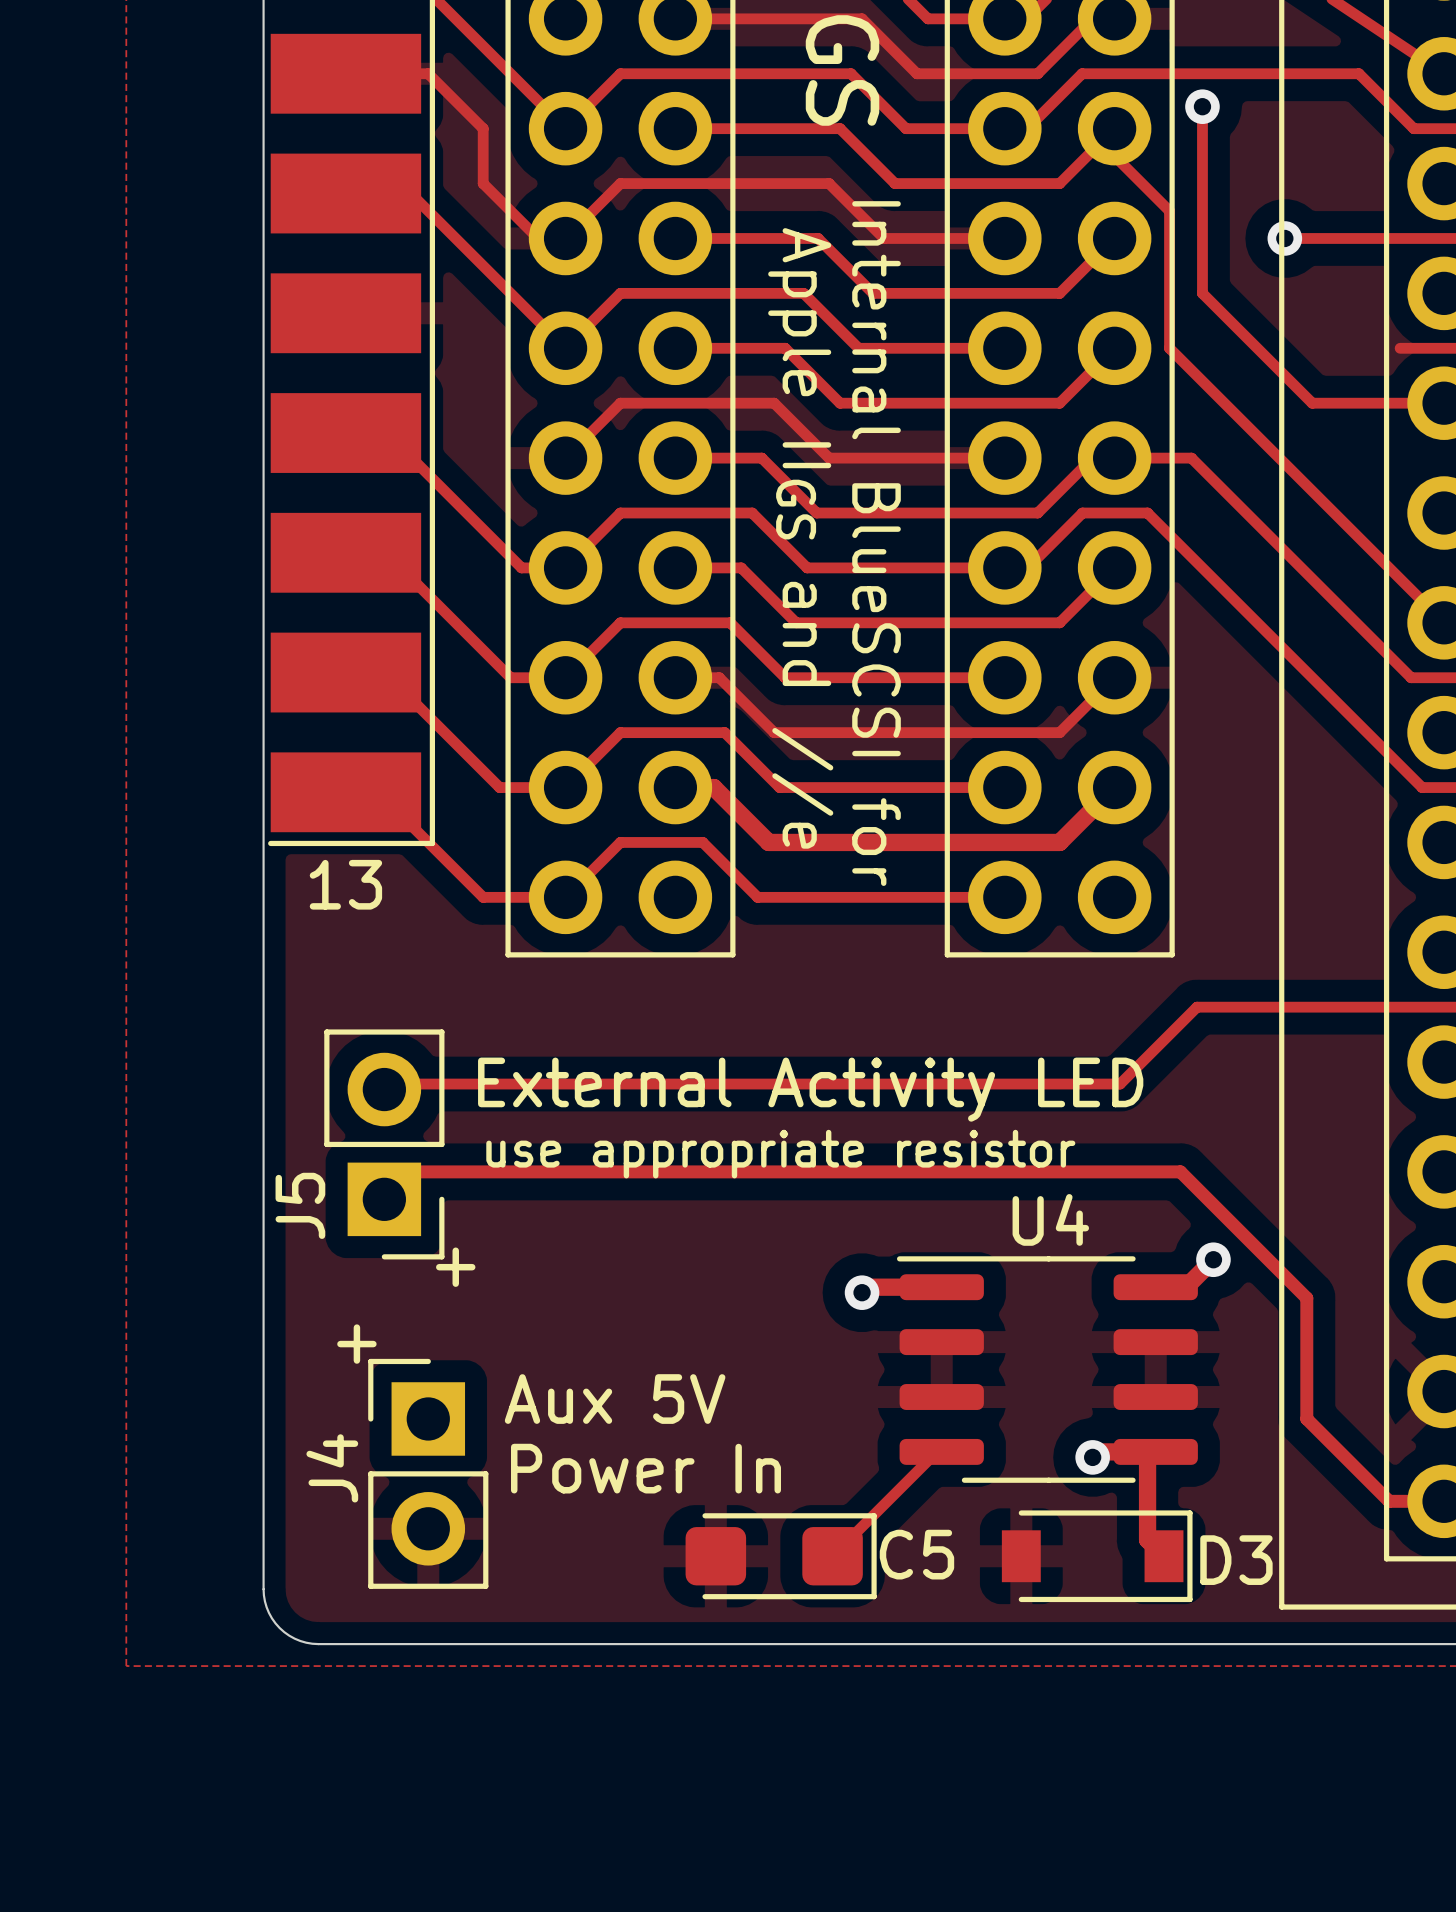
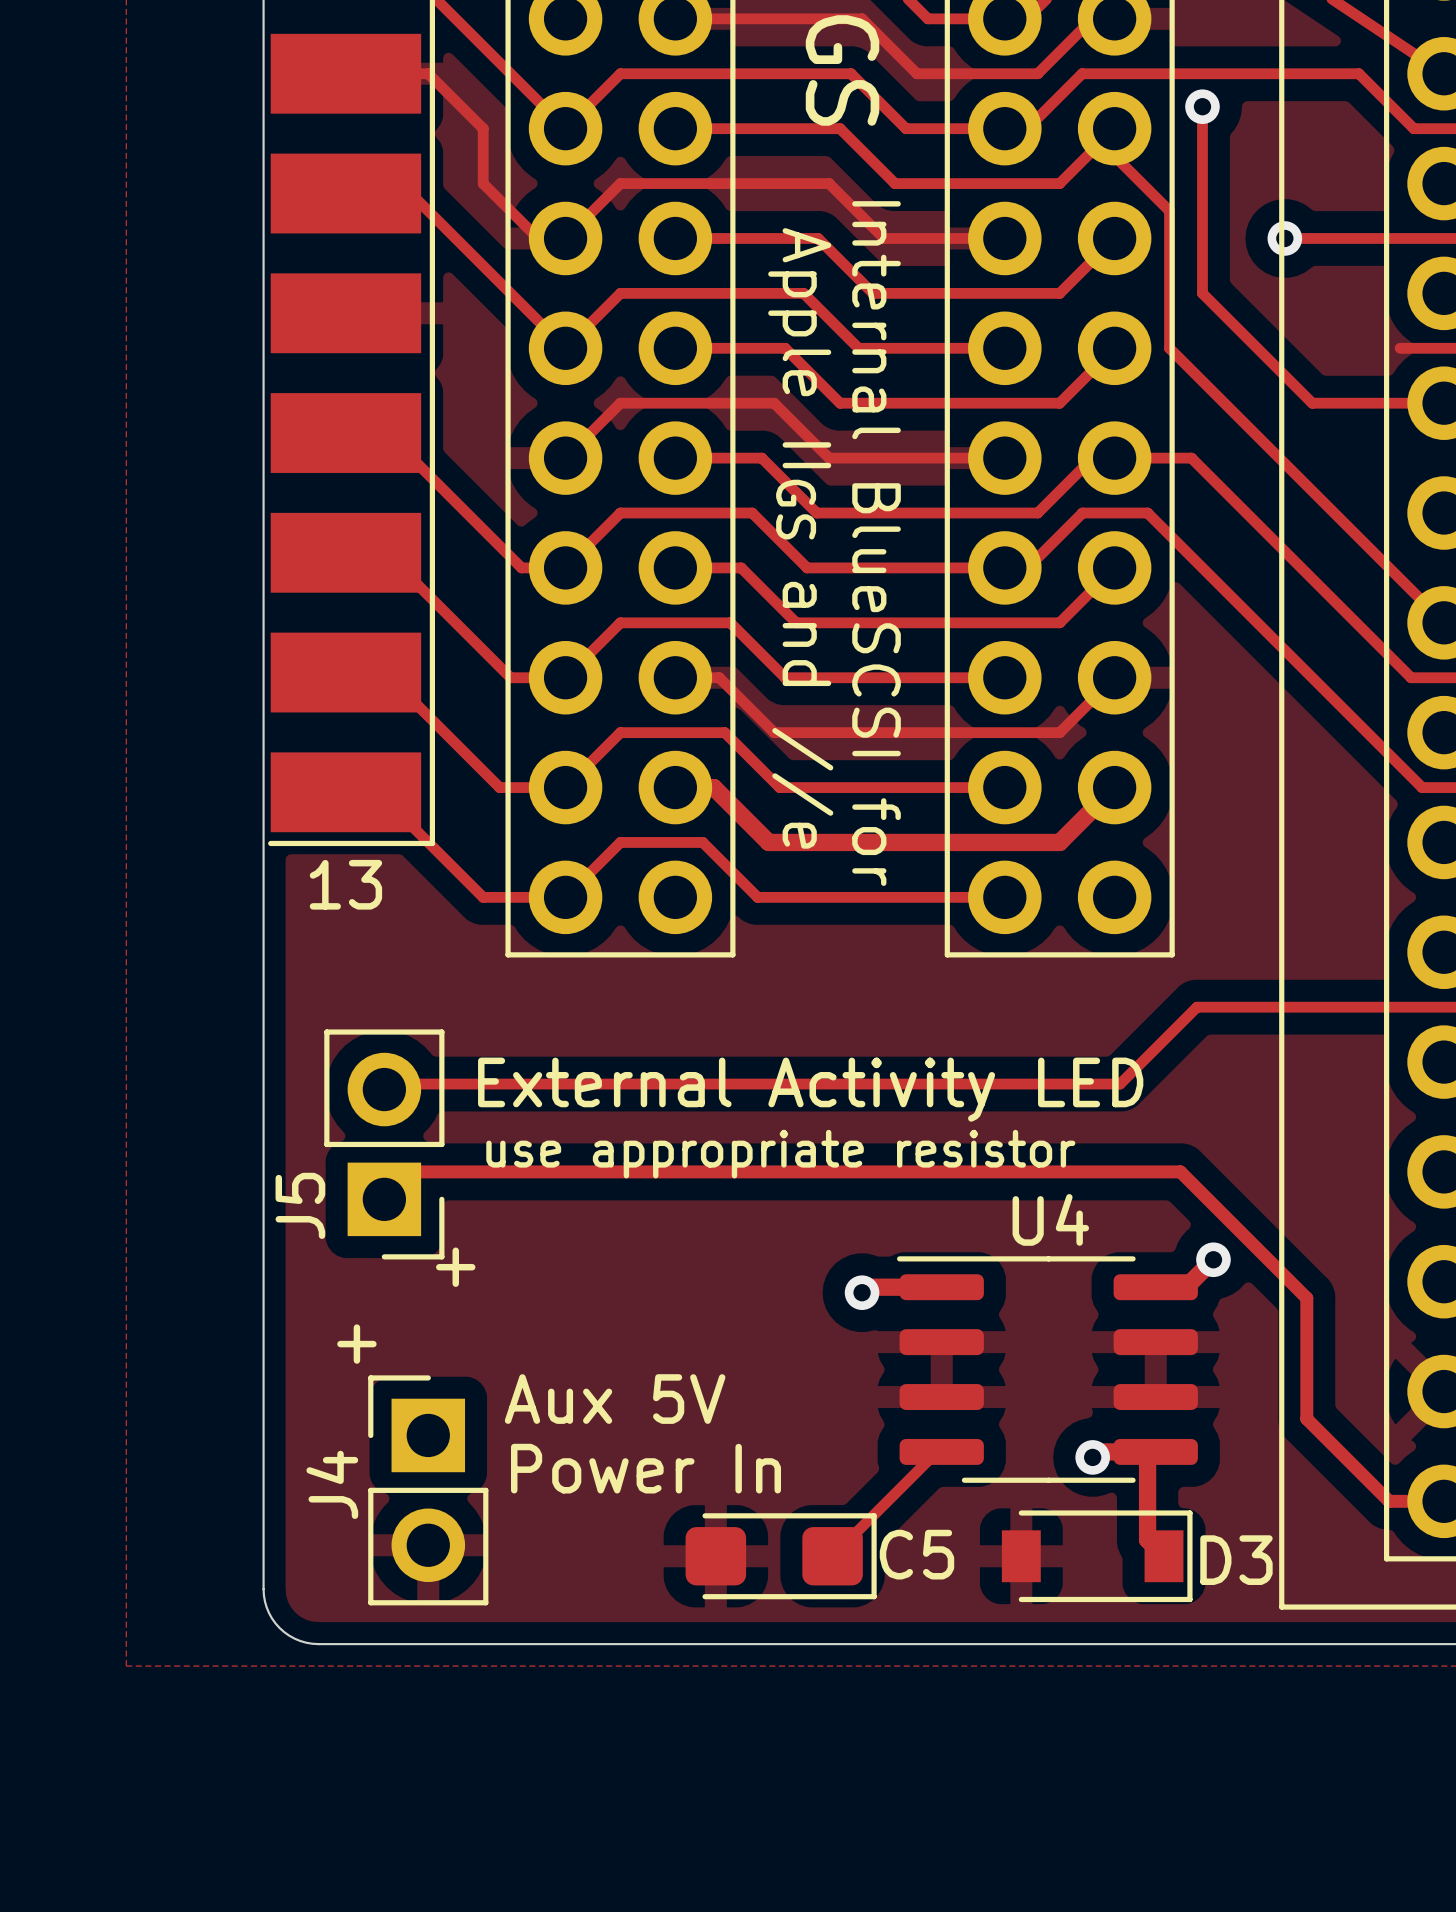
J4 position: (428, 1473) -> (428, 1490)

